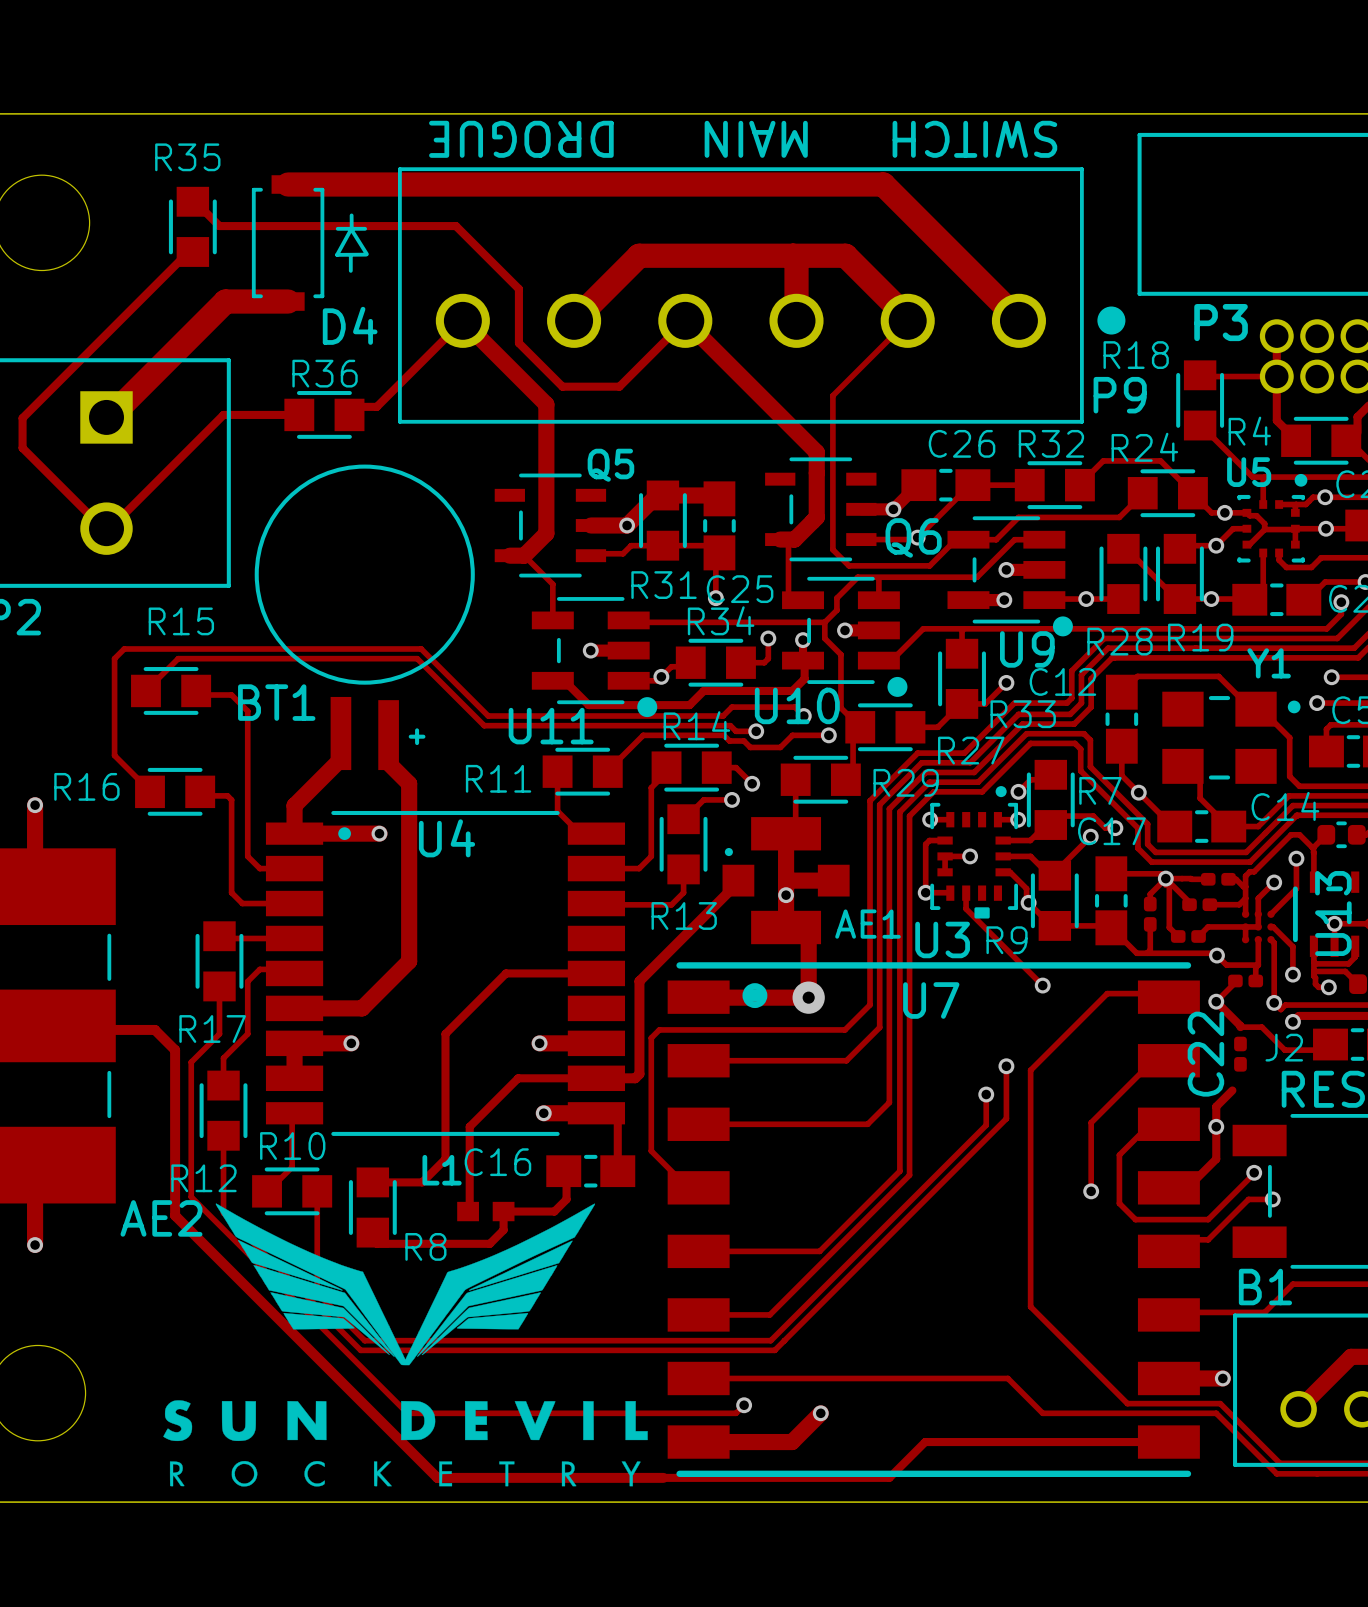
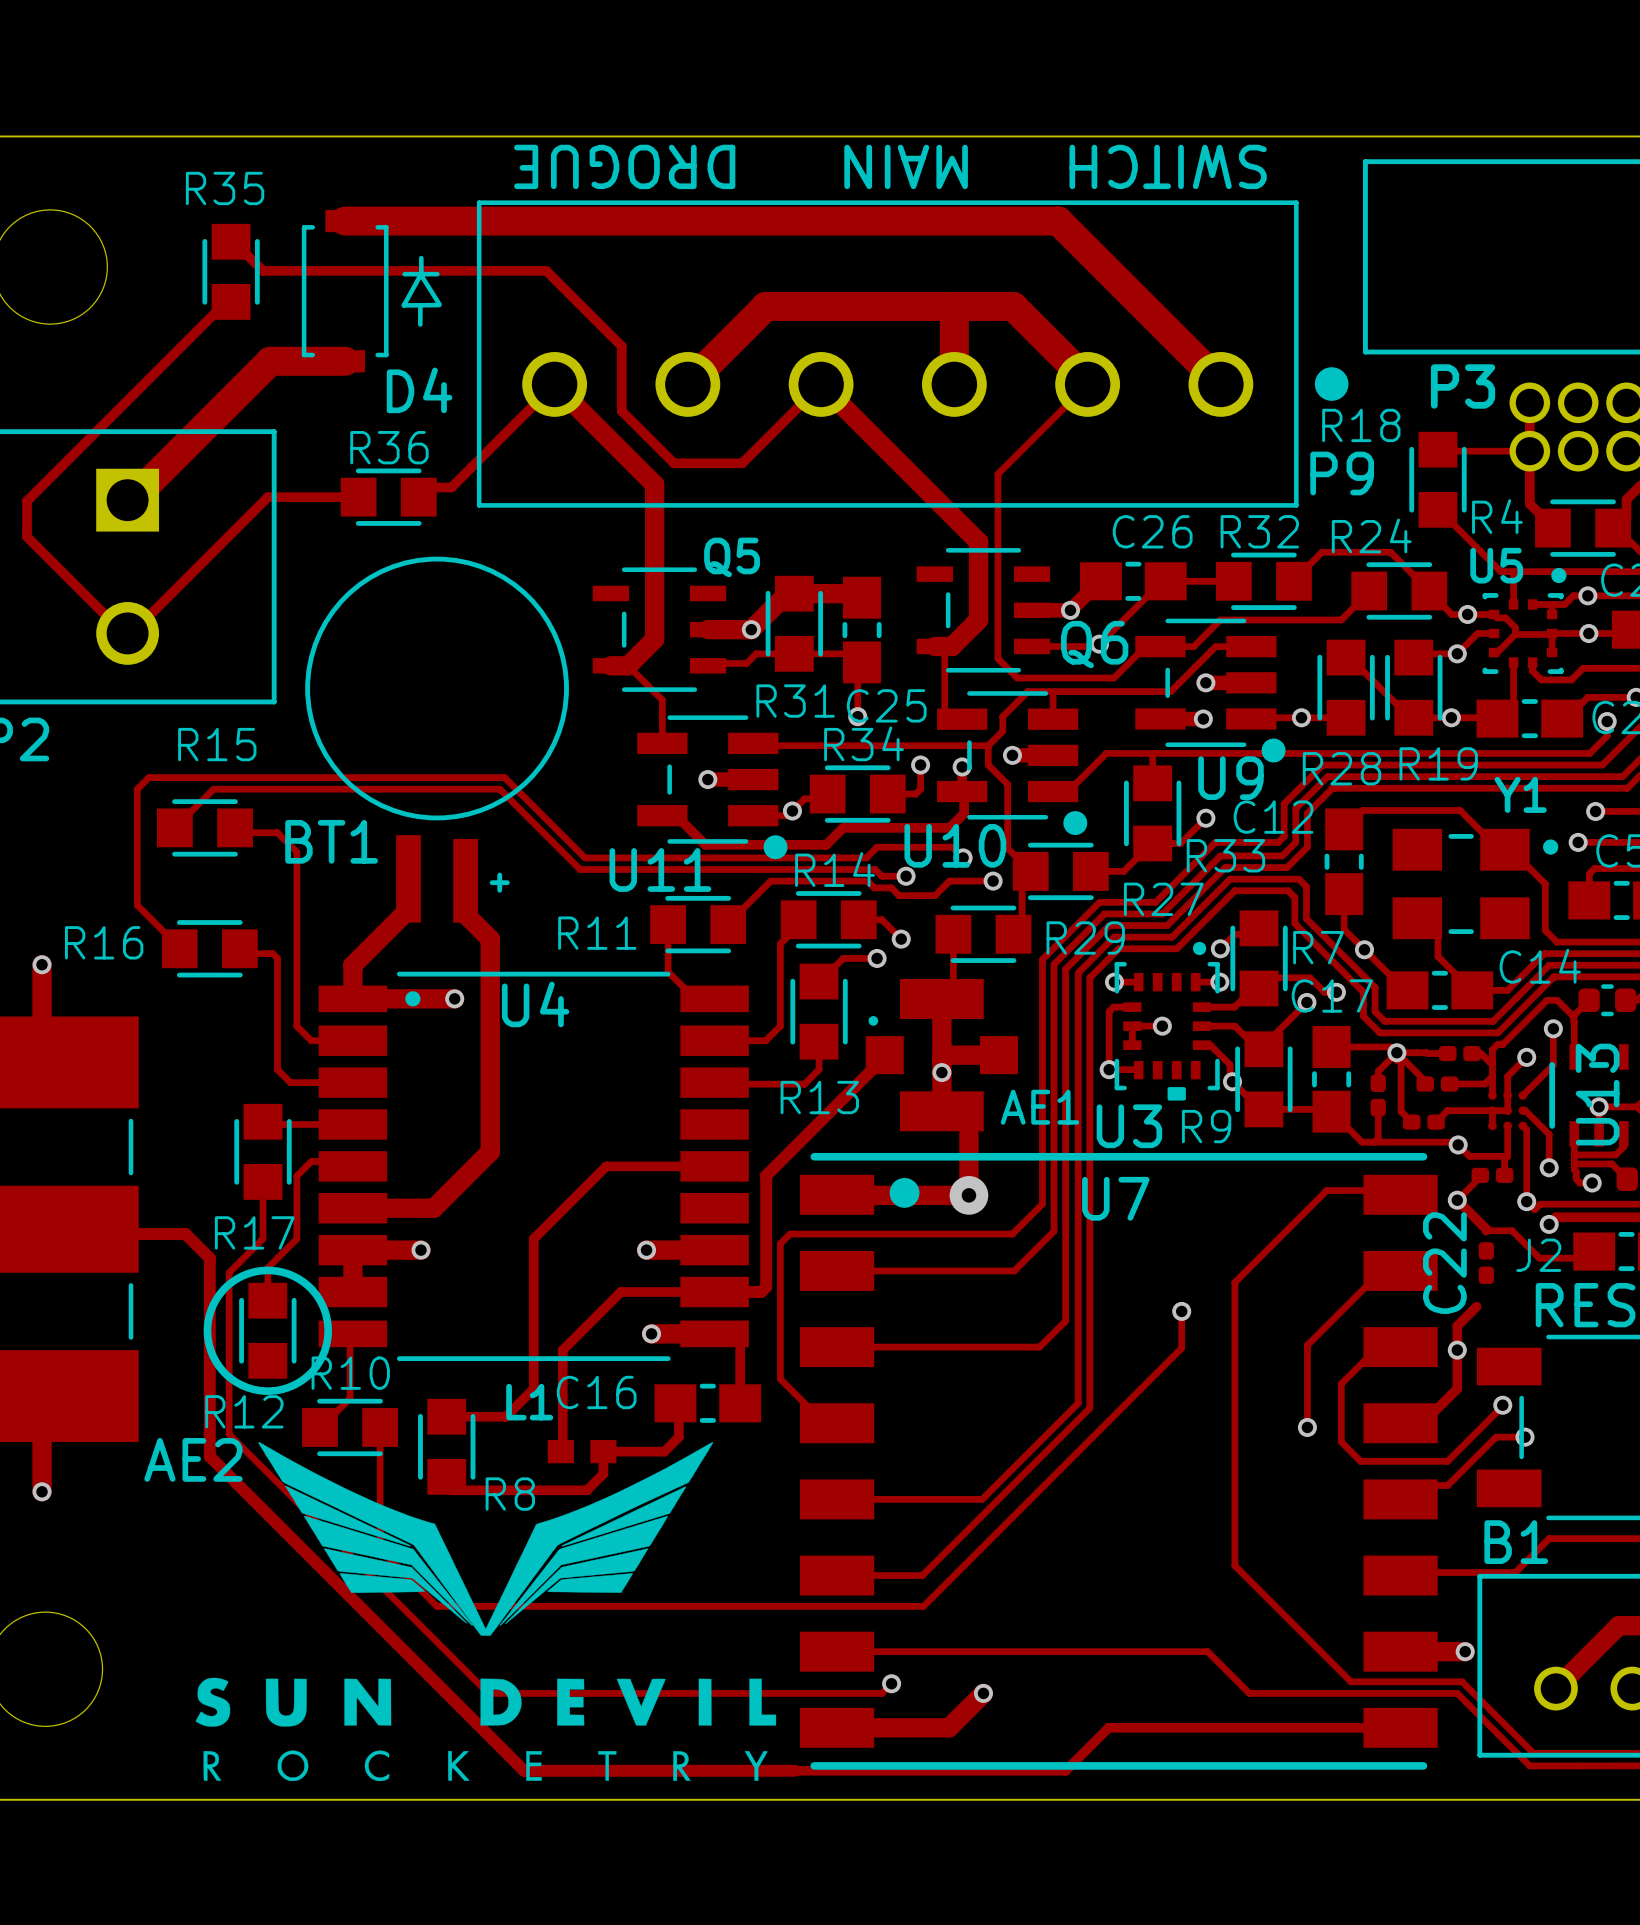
track: (966, 892) (966, 908) (1042, 985) -> none
via: (1042, 985) -> none
drawing: none -> [203, 1266, 332, 1395]
track: (1006, 1066) (1006, 1118) (774, 1350) (360, 1350) (223, 1213) -> none
via: (1006, 1066) -> none
track: (223, 1135) (223, 1211) -> none

